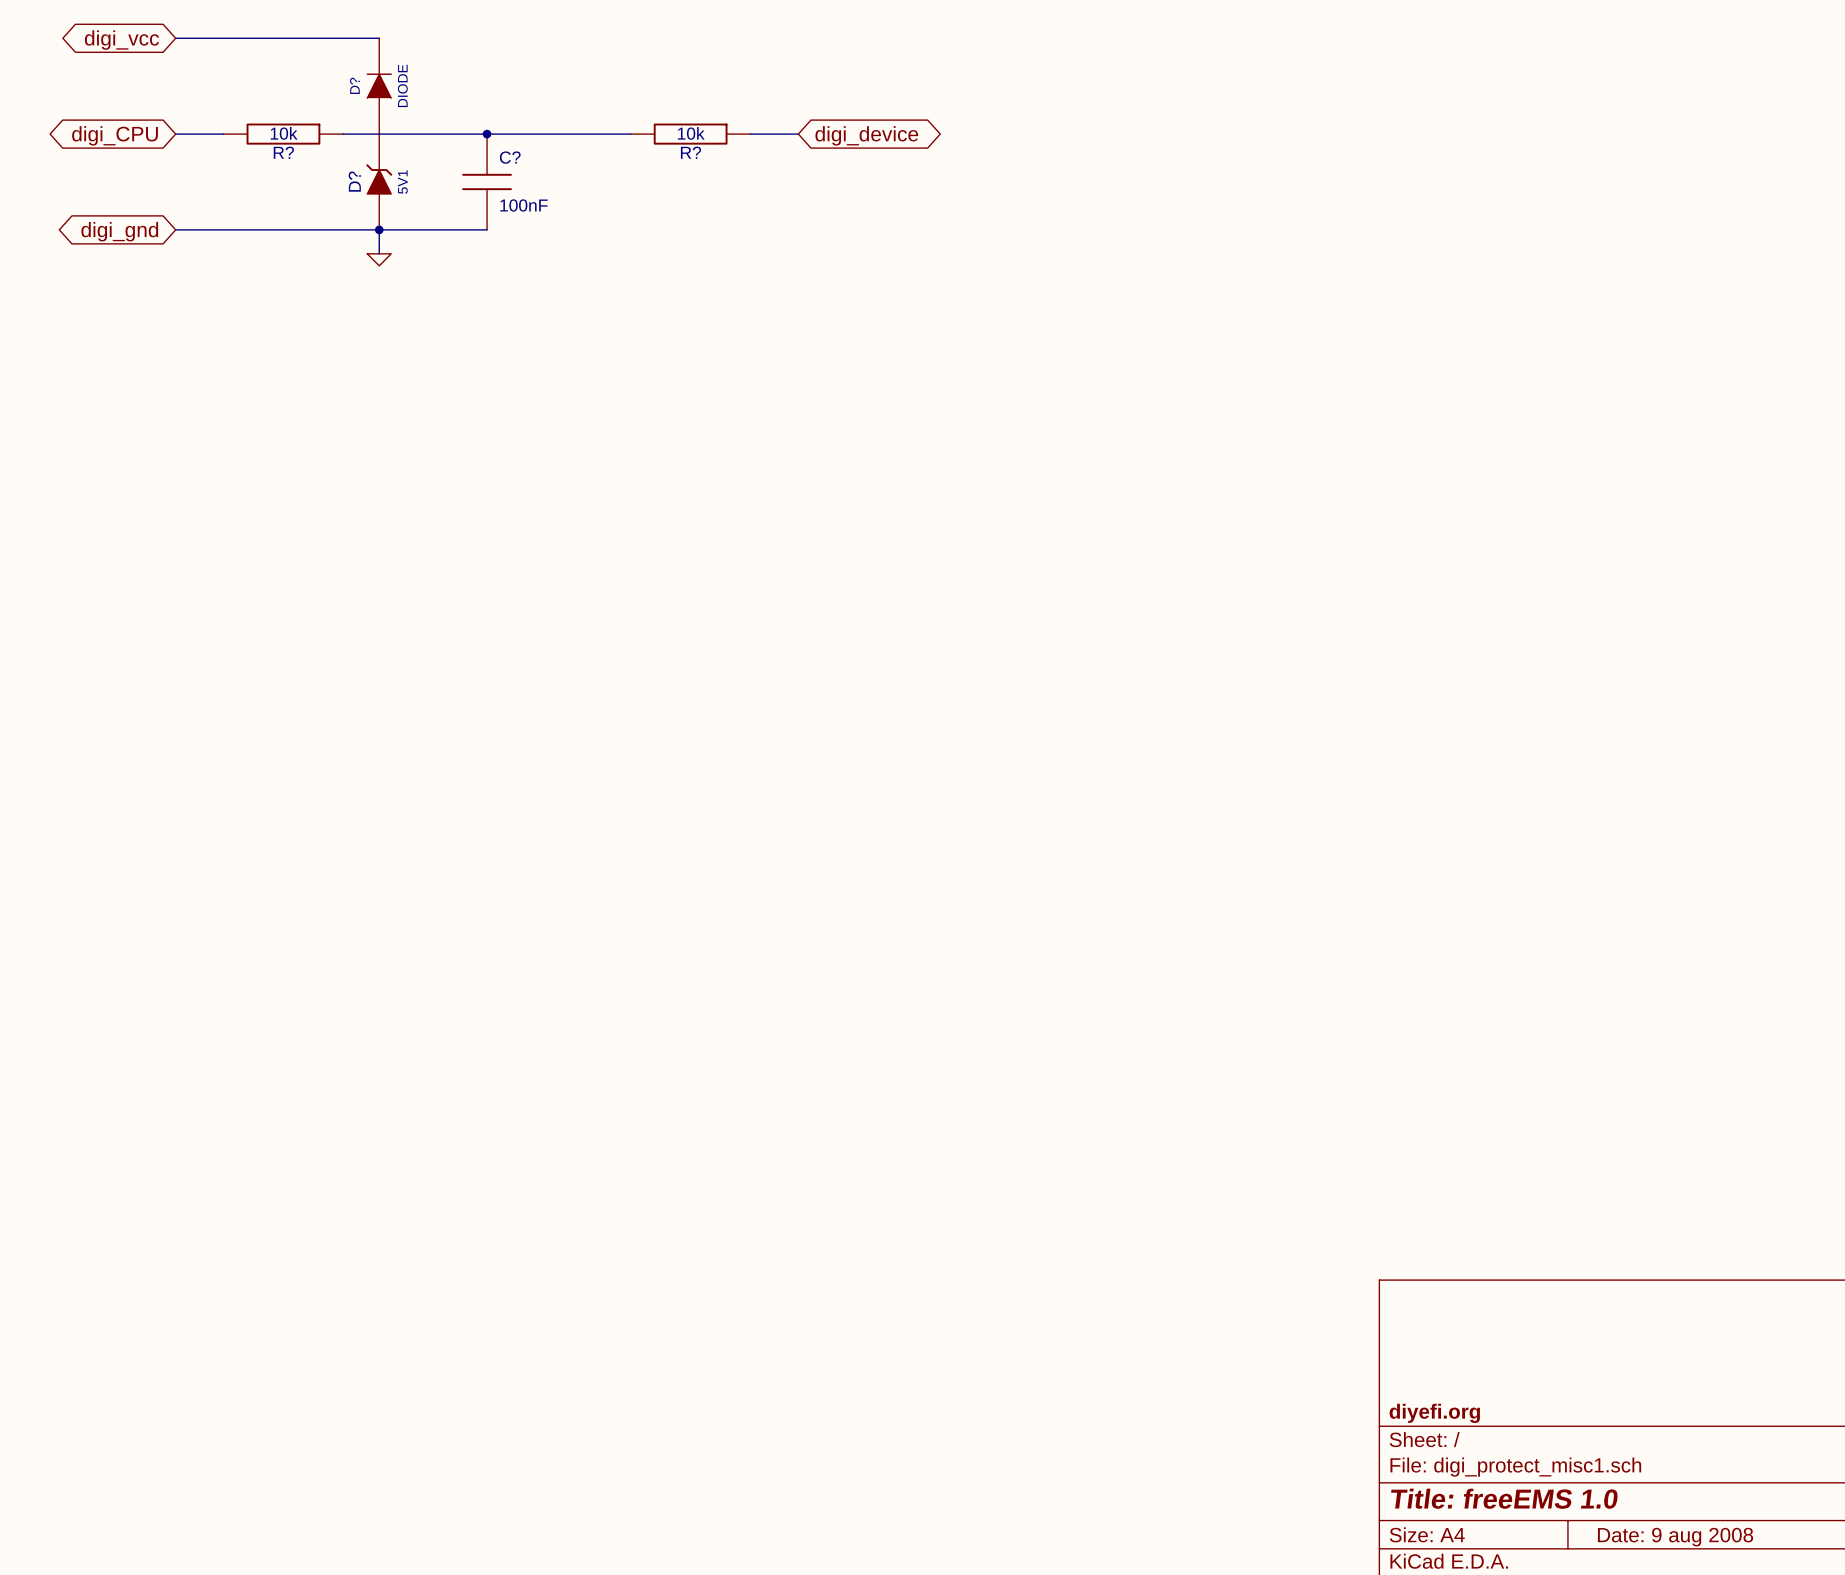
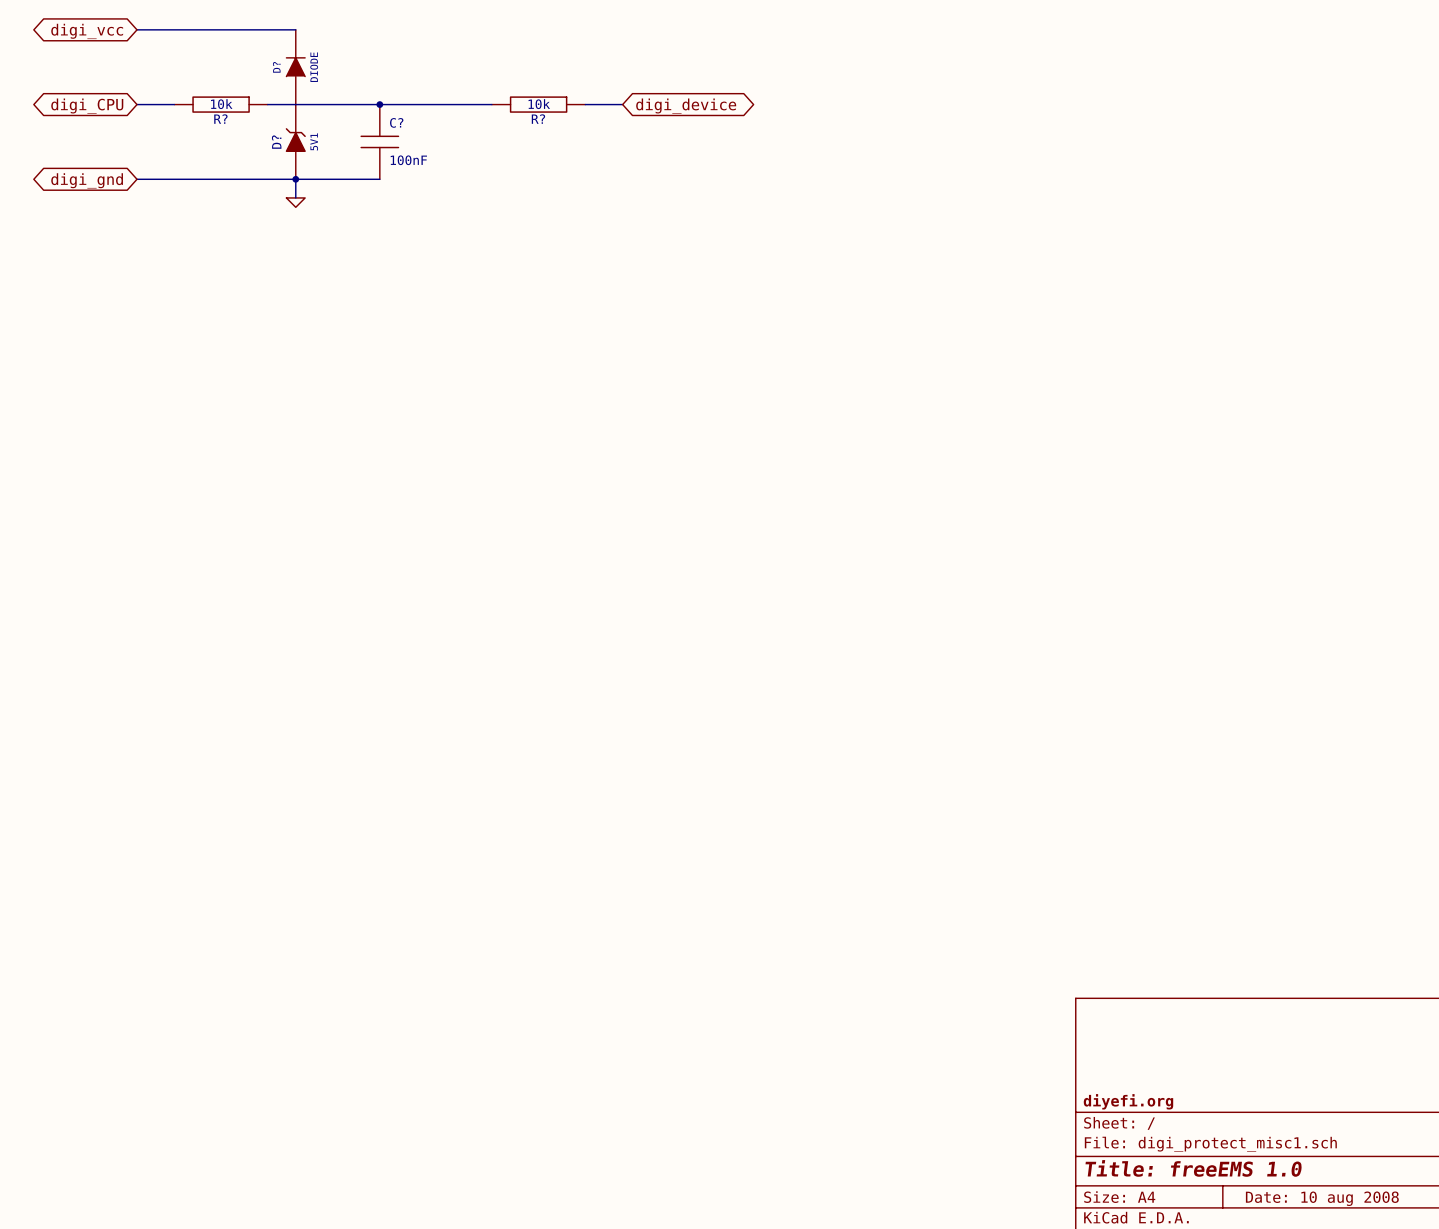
title block: Date: 9 aug 2008 (1675, 1537) -> Date: 10 aug 2008 (1322, 1198)

